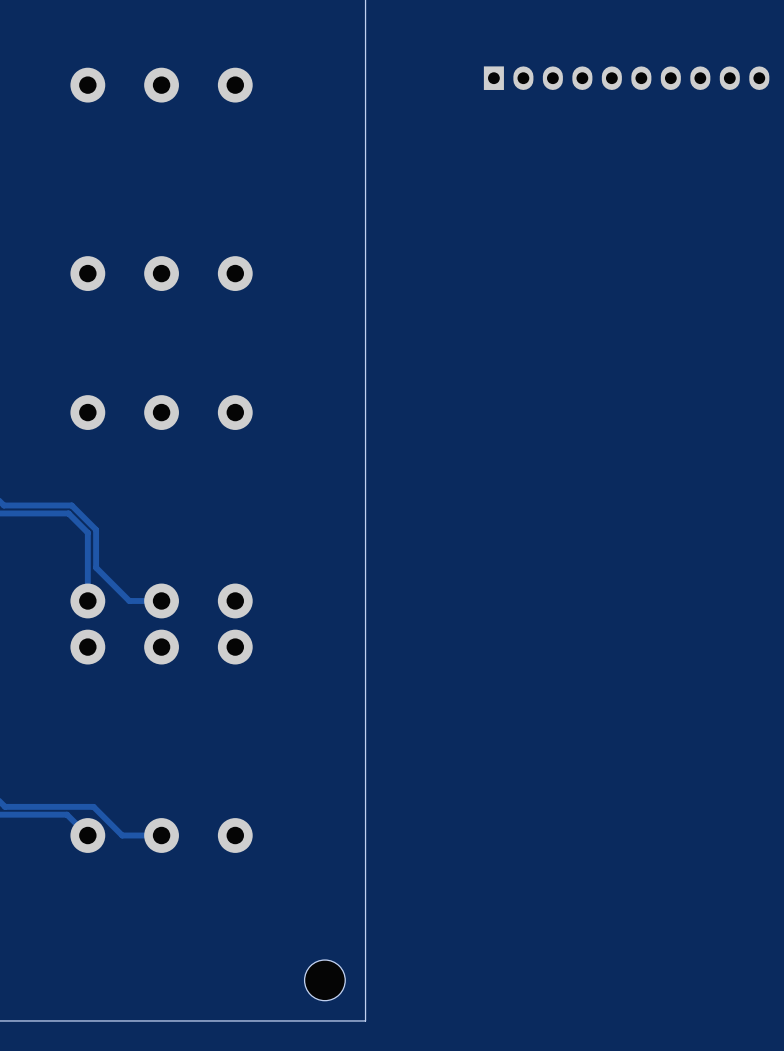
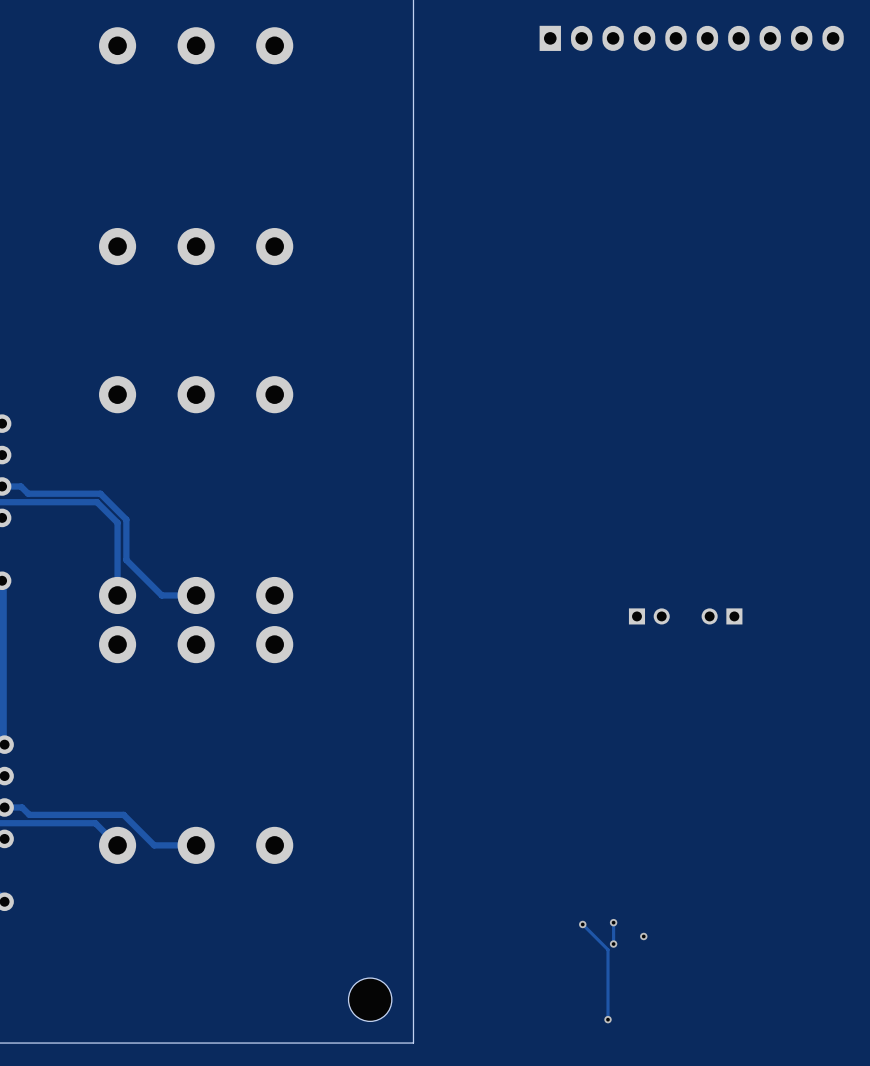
part: none -> (649, 616)
part: none -> (722, 616)
track: none -> (613, 922) (613, 944)
via: none -> (613, 922)
track: none -> (582, 924) (608, 949) (608, 1019)
via: none -> (582, 924)
via: none -> (643, 936)
via: none -> (613, 944)
via: none -> (608, 1019)

